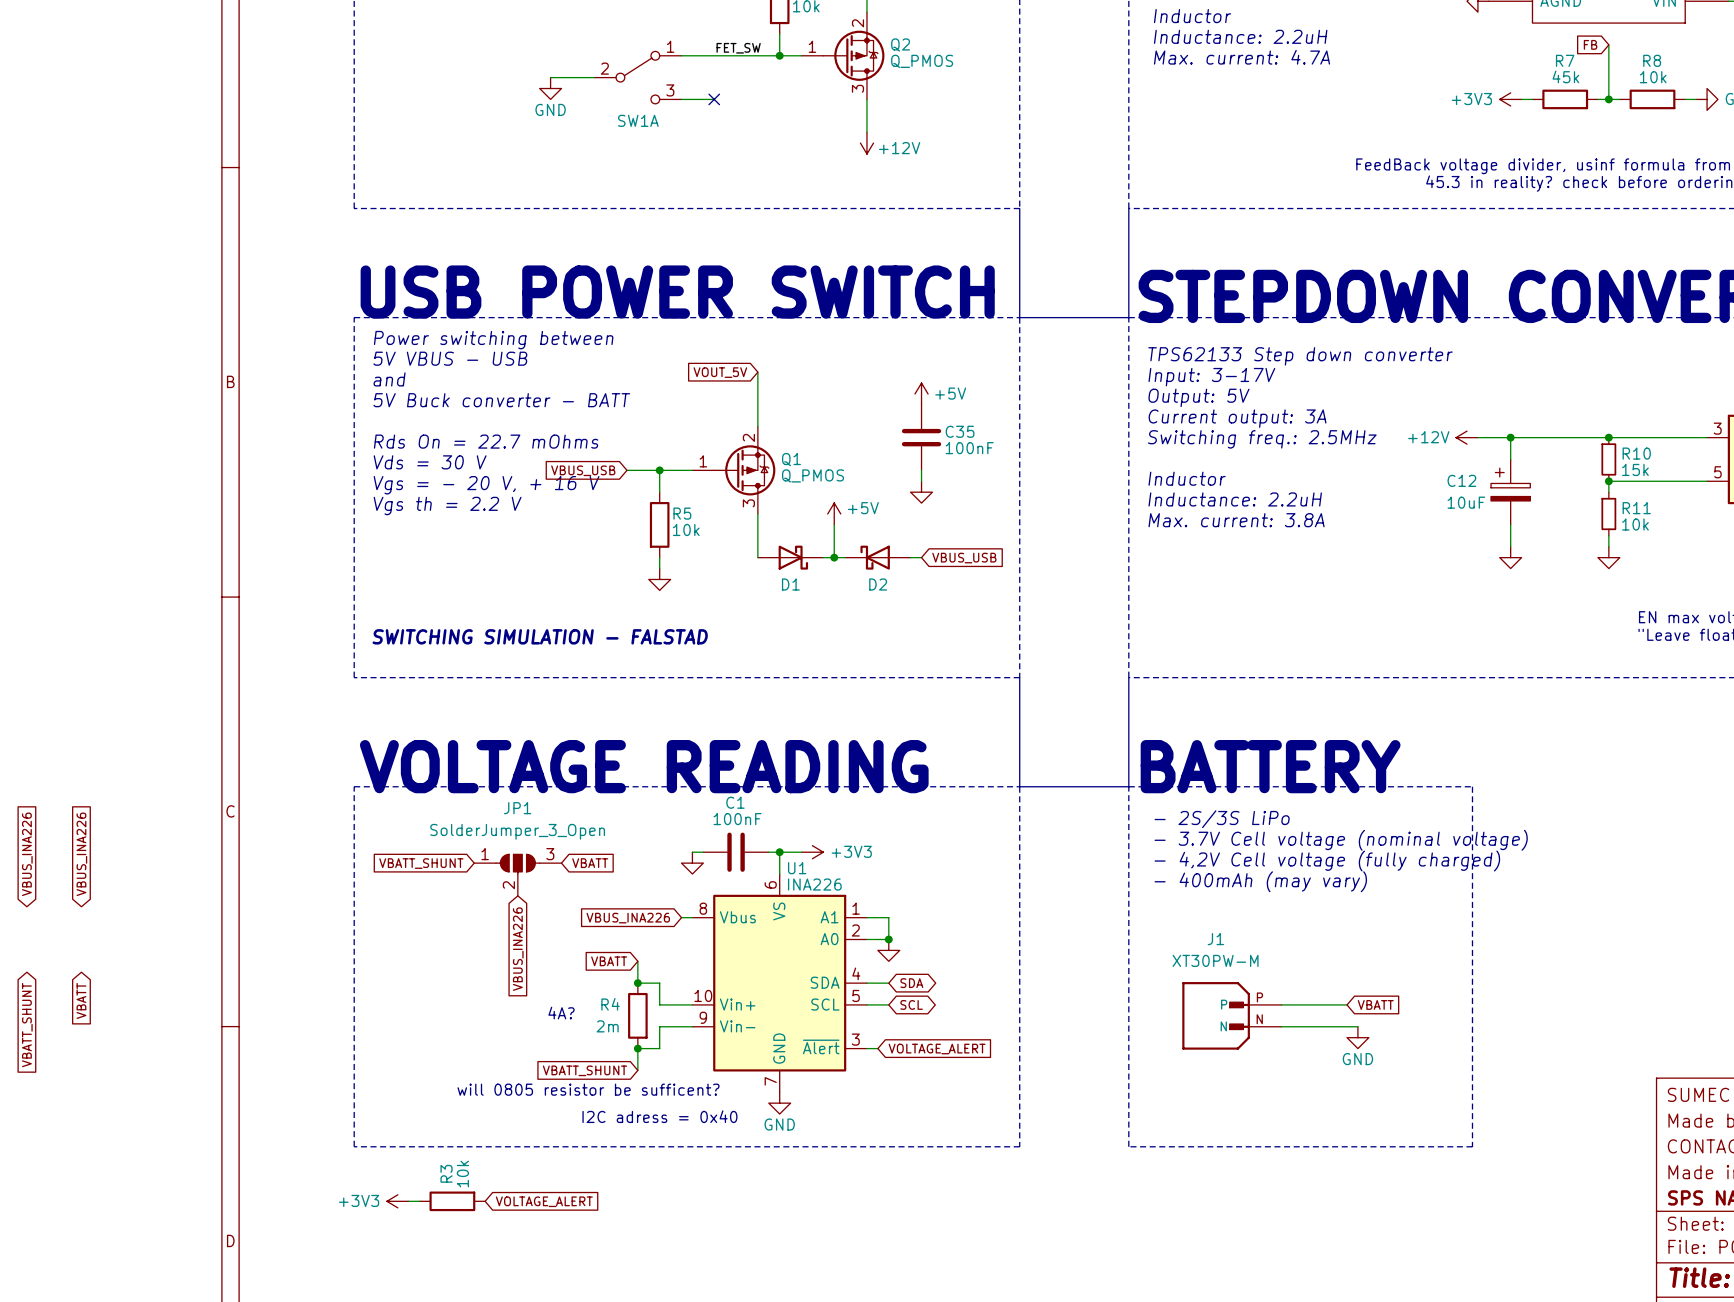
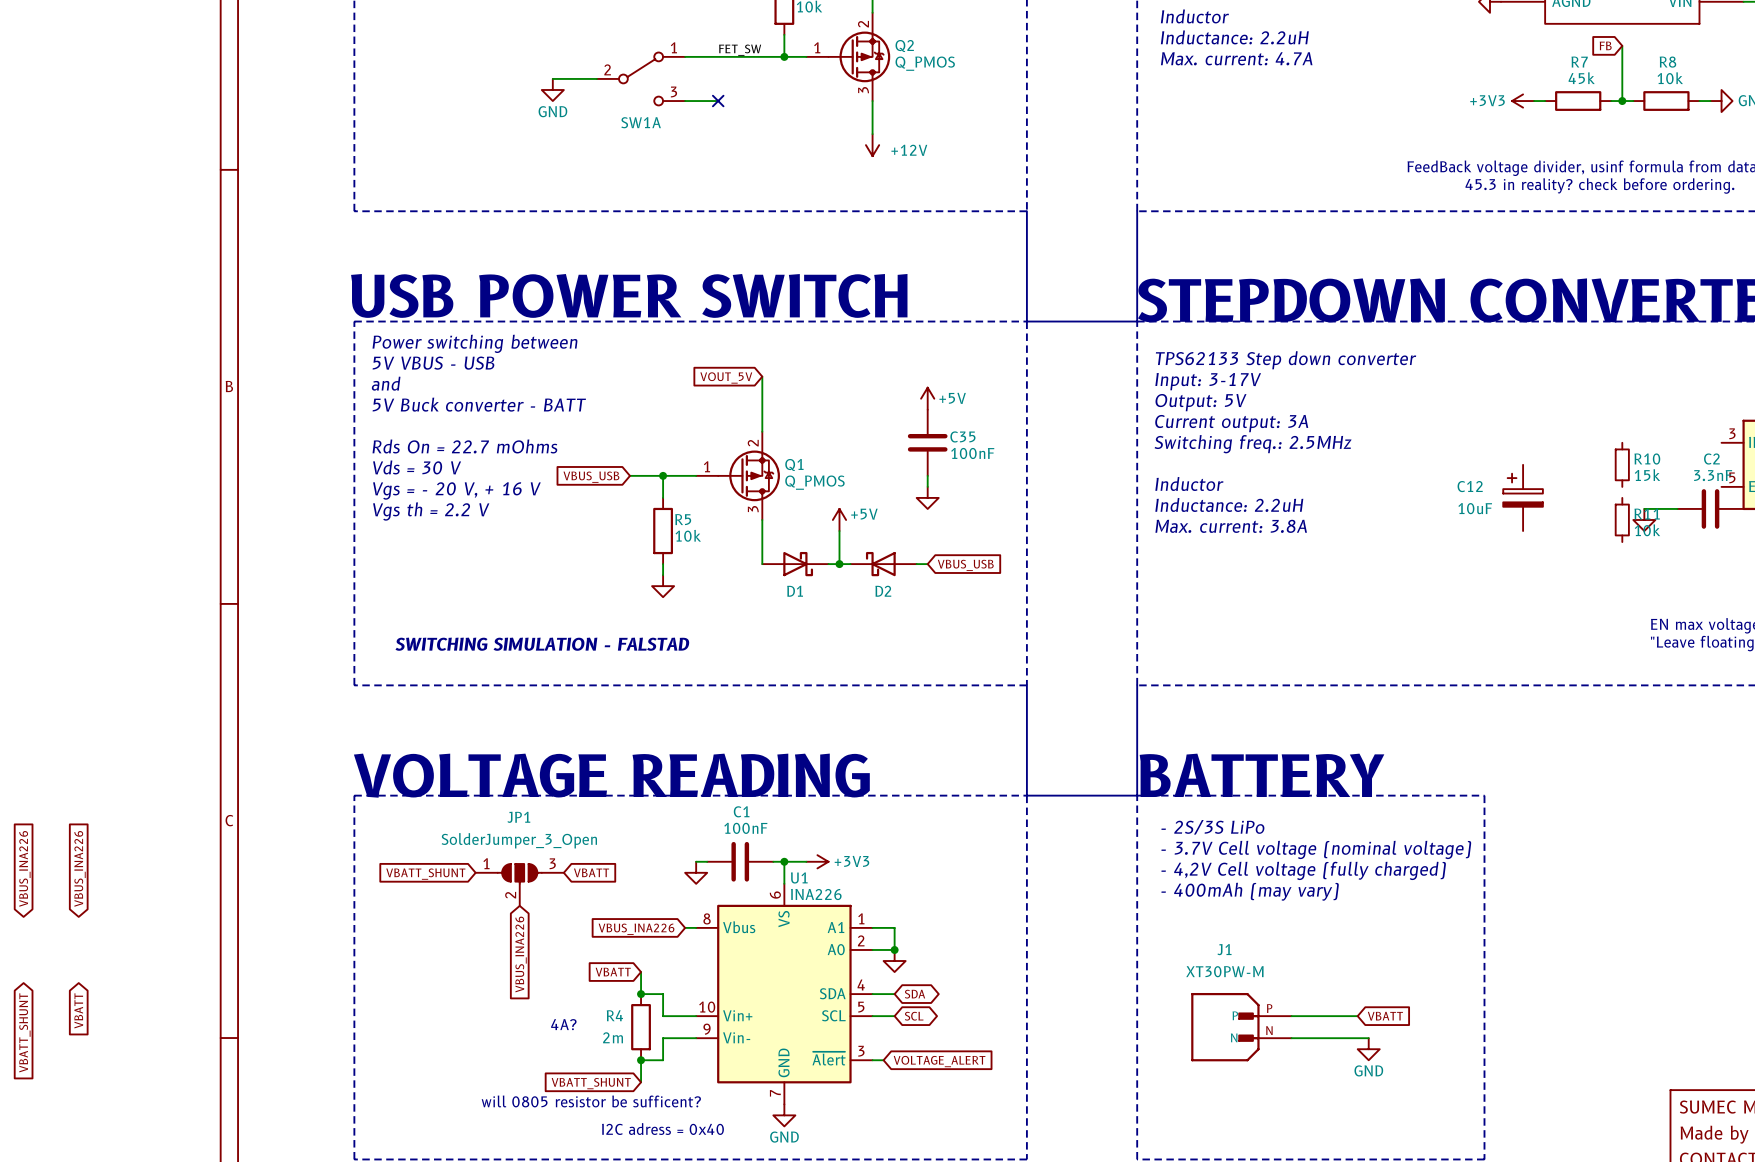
power symbol: +12V (1467, 437) -> none
wire: (1477, 437) (1707, 437) -> none
wire: (1510, 437) (1510, 459) -> none
junction: (1510, 437) -> none
junction: (1608, 437) -> none
junction: (1608, 481) -> none
wire: (1707, 481) (1608, 481) (1608, 492) -> none
wire: none -> (1644, 508) (1677, 508)
C2: none -> 3.3nF (1710, 508)
wire: (1510, 524) (1510, 546) -> none
wire: (1608, 535) (1608, 546) -> none
power symbol: (1510, 557) -> none
power symbol position: (1608, 557) -> (1644, 519)

